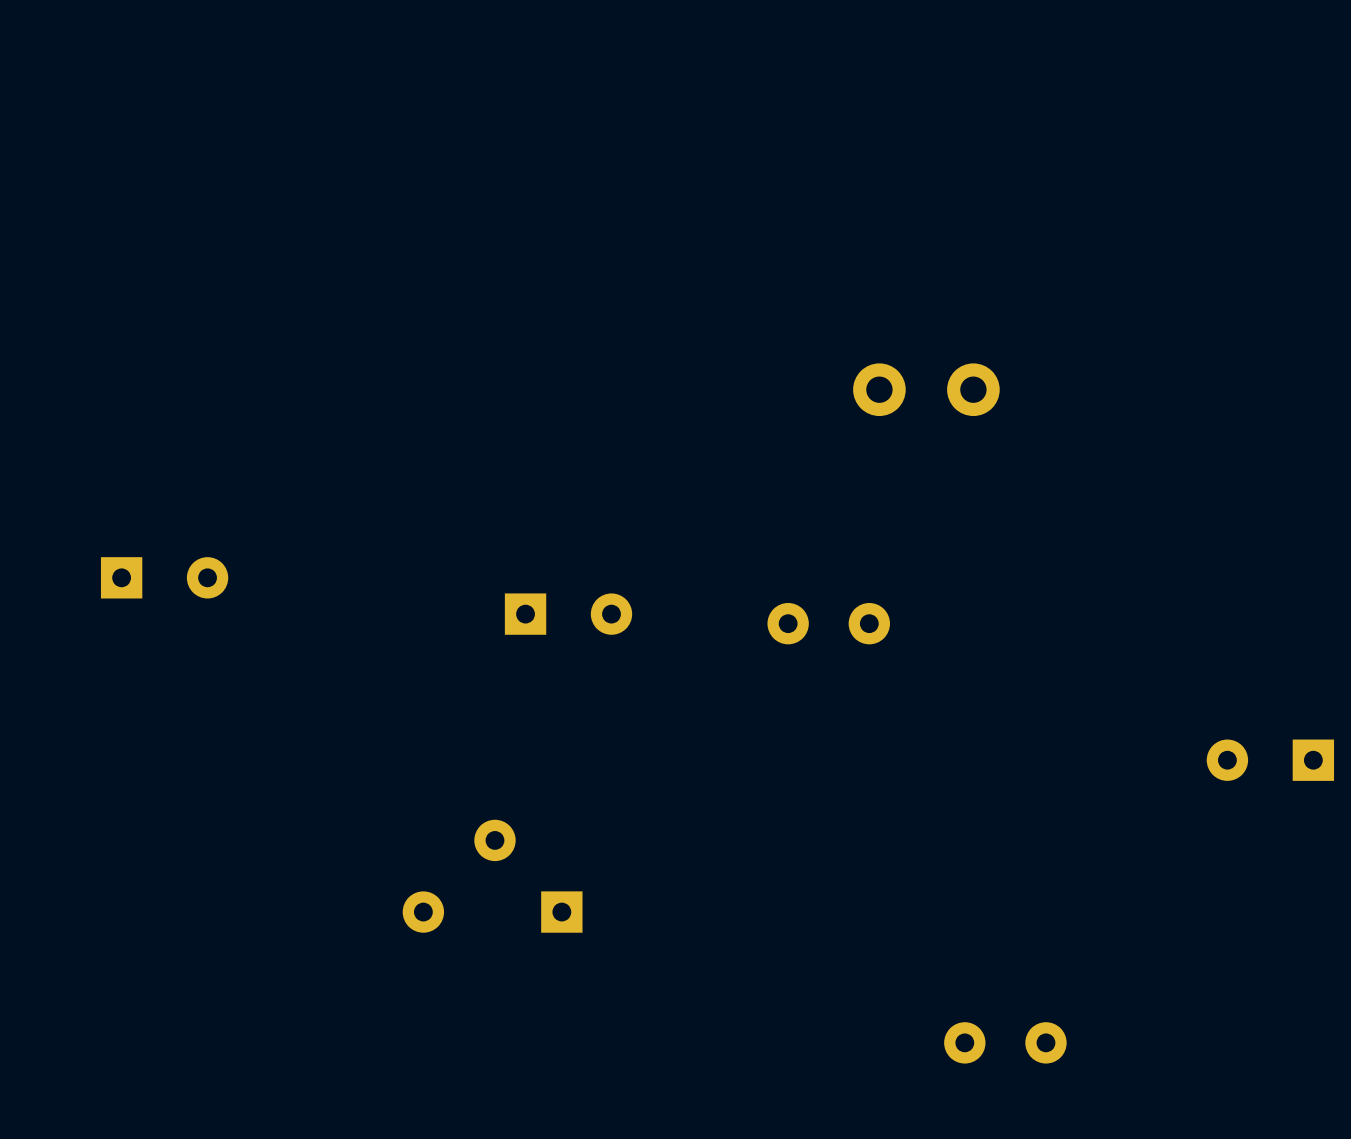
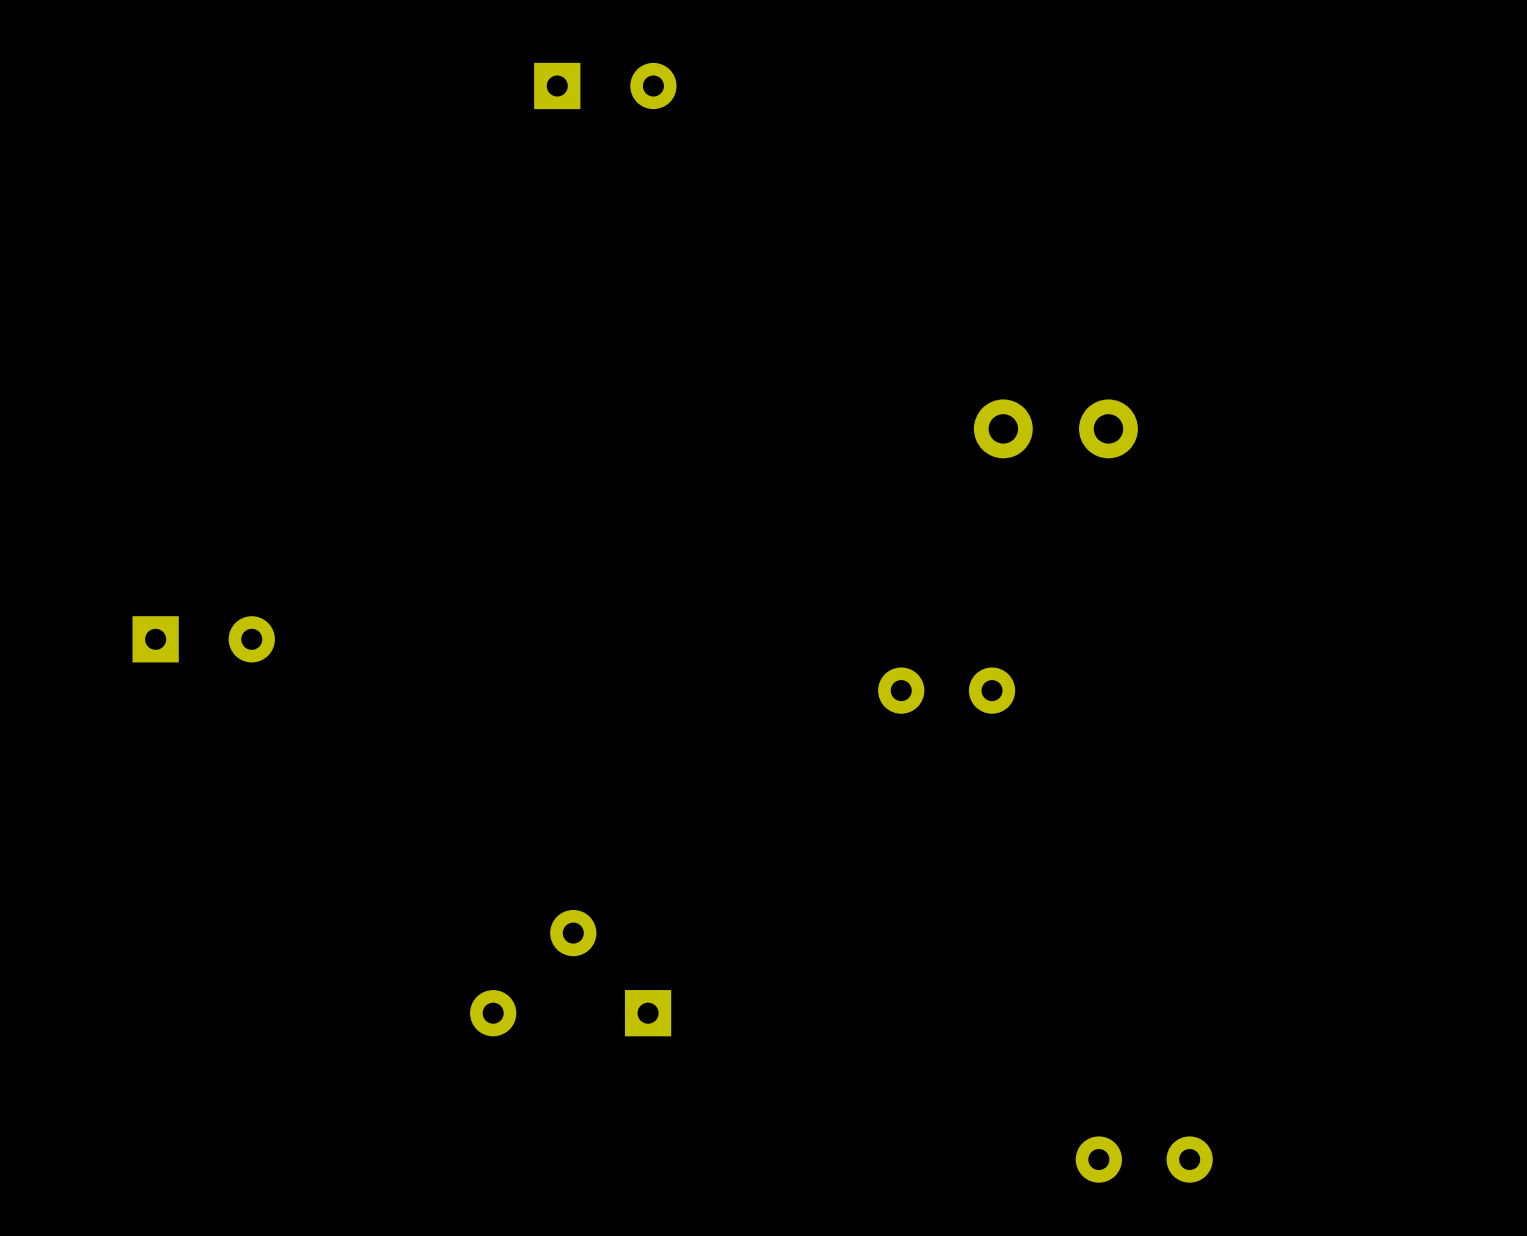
part: none -> (605, 85)
part: (568, 614) -> none
part: (1270, 760) -> none

